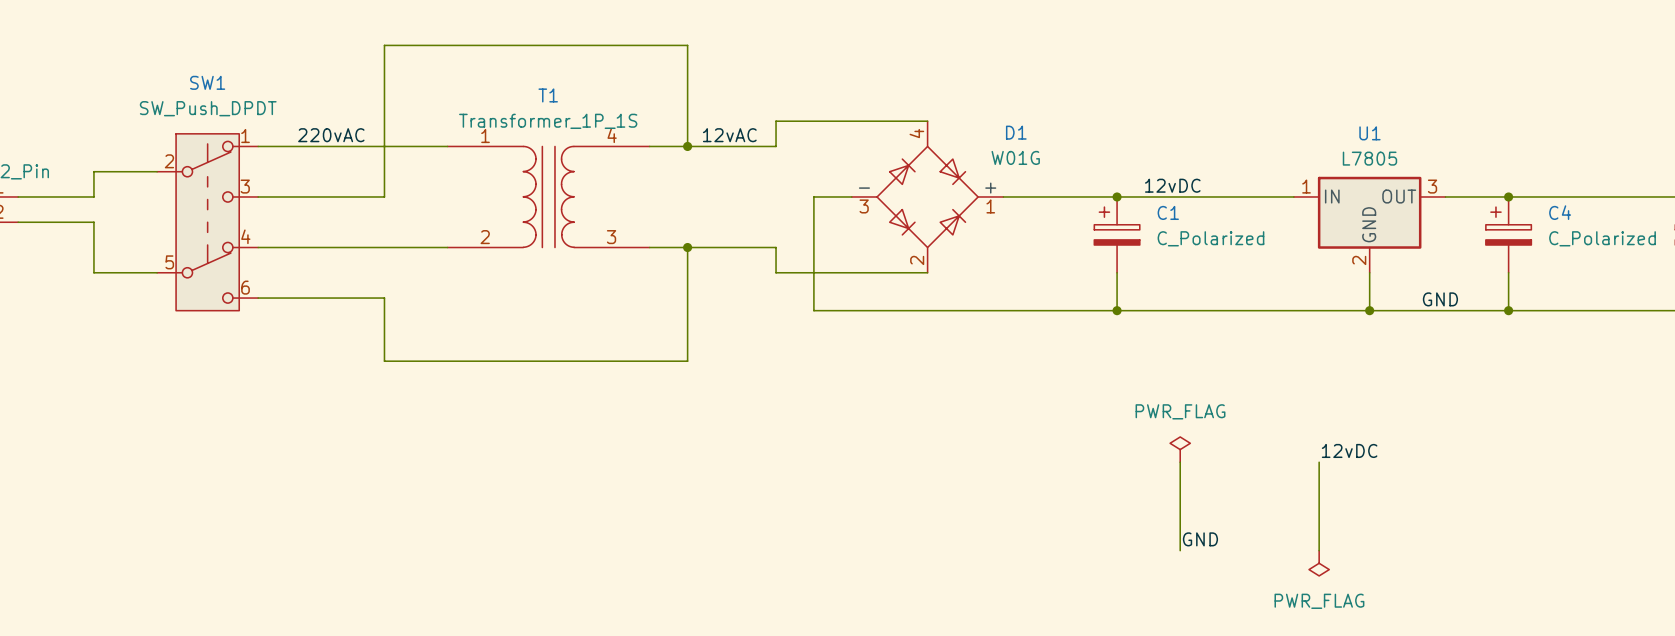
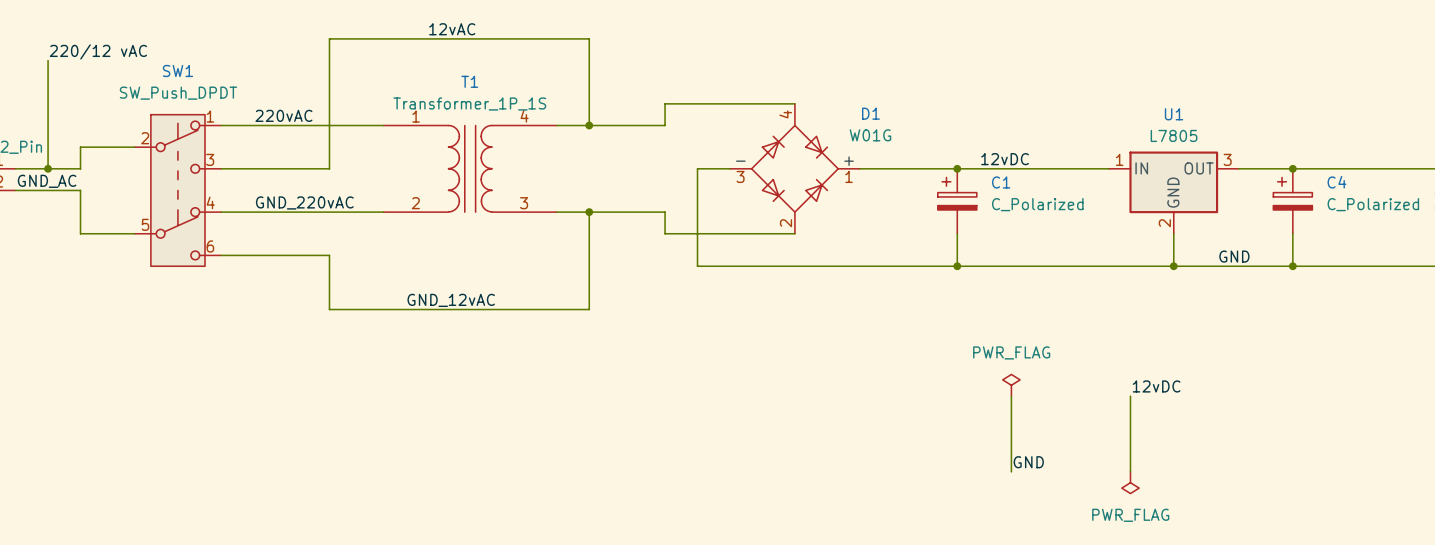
label: none -> 220/12 vAC (98, 51)
wire: none -> (48, 60) (48, 168)
label position: 12vAC (729, 135) -> 12vAC (452, 29)
junction: none -> (48, 168)
label: none -> GND_AC (47, 181)
label: none -> GND_220vAC (304, 202)
label: none -> GND_12vAC (451, 300)

